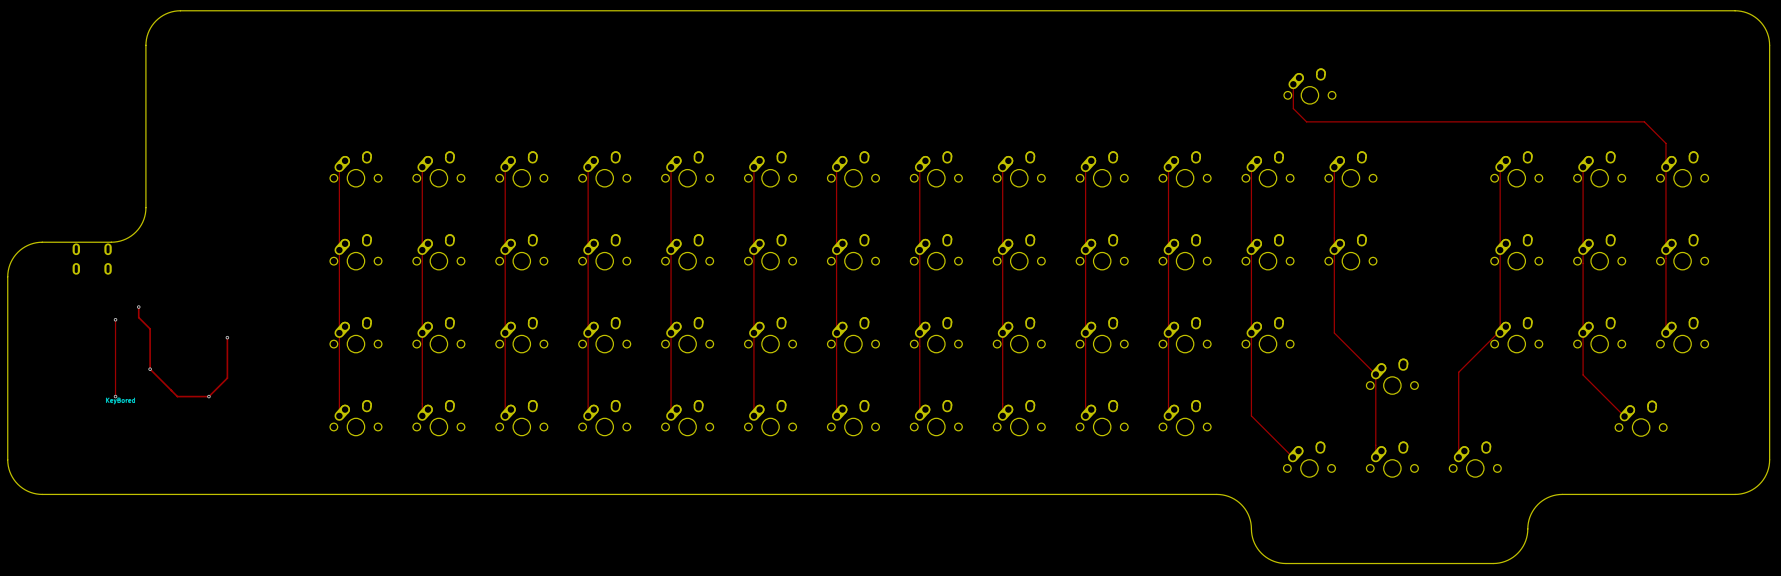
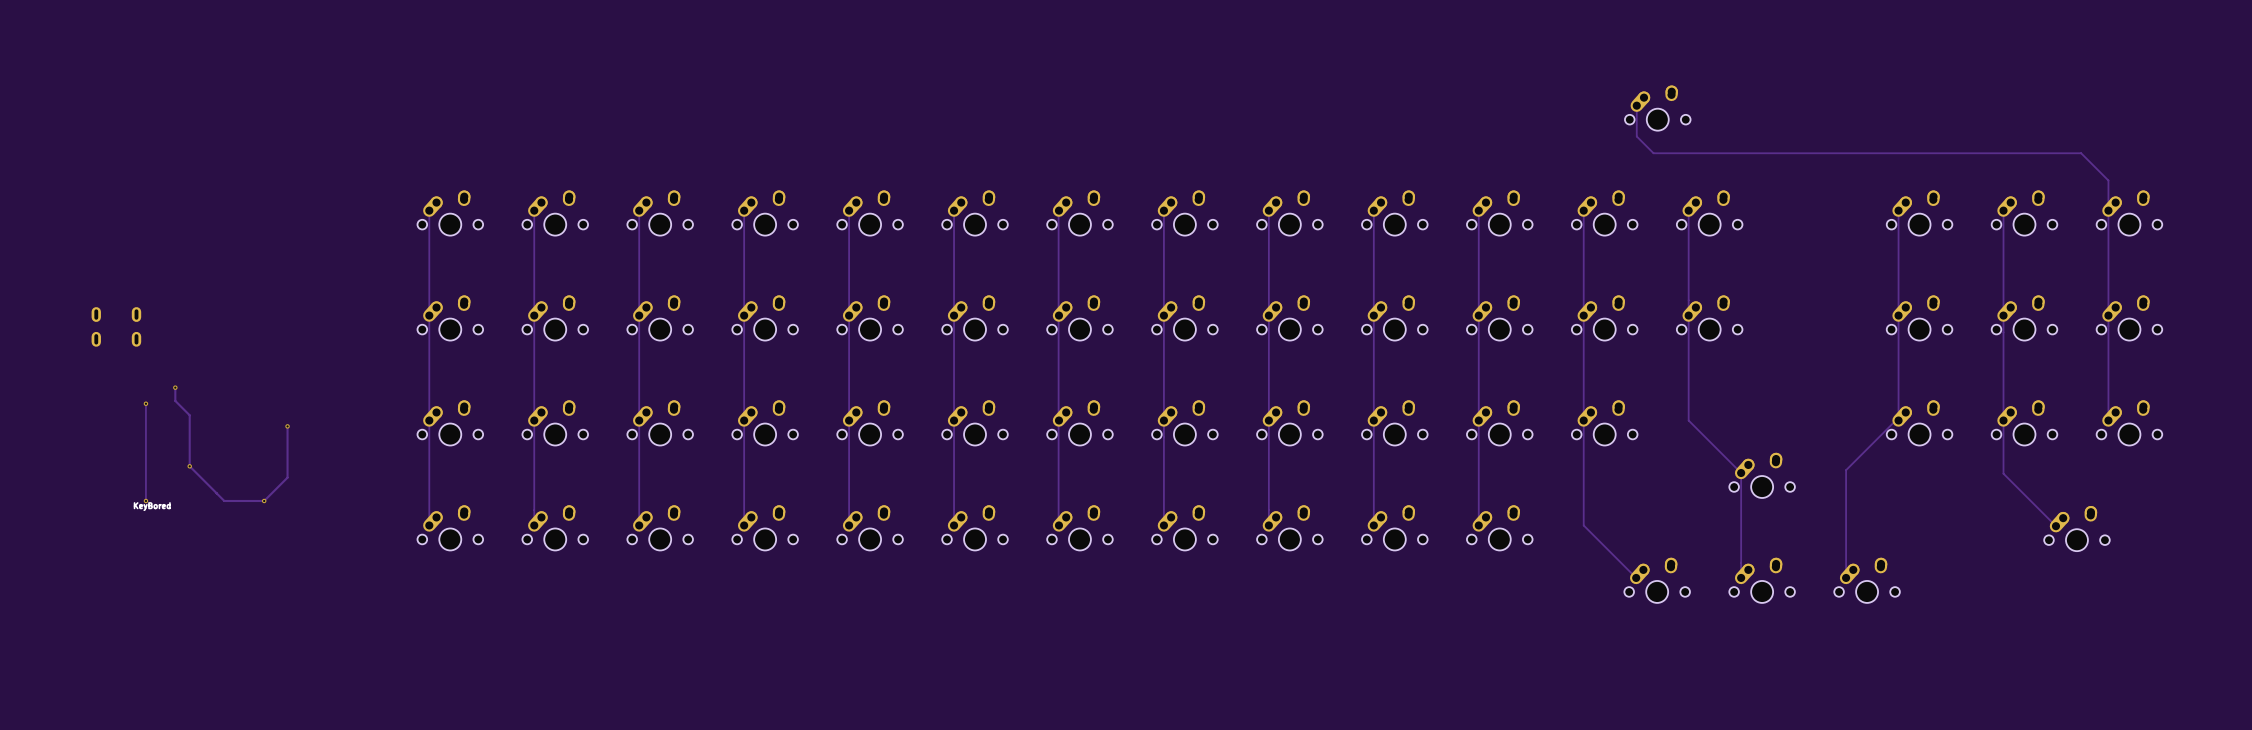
board edge: (180, 10) (1744, 11) (1754, 17) (1761, 23) (1767, 33) (1769, 42) (1768, 468) (1765, 477) (1757, 486) (1746, 492) (1738, 494) (1562, 494) (1550, 496) (1540, 502) (1532, 511) (1525, 540) (1519, 551) (1507, 560) (1493, 563) (1277, 562) (1266, 557) (1256, 546) (1249, 517) (1243, 506) (1234, 499) (1219, 494) (33, 493) (25, 489) (15, 482) (9, 471) (7, 462) (8, 267) (17, 252) (33, 243) (117, 241) (131, 235) (139, 227) (143, 219) (145, 207) (146, 39) (150, 28) (158, 18) (168, 12) (180, 10) -> none

